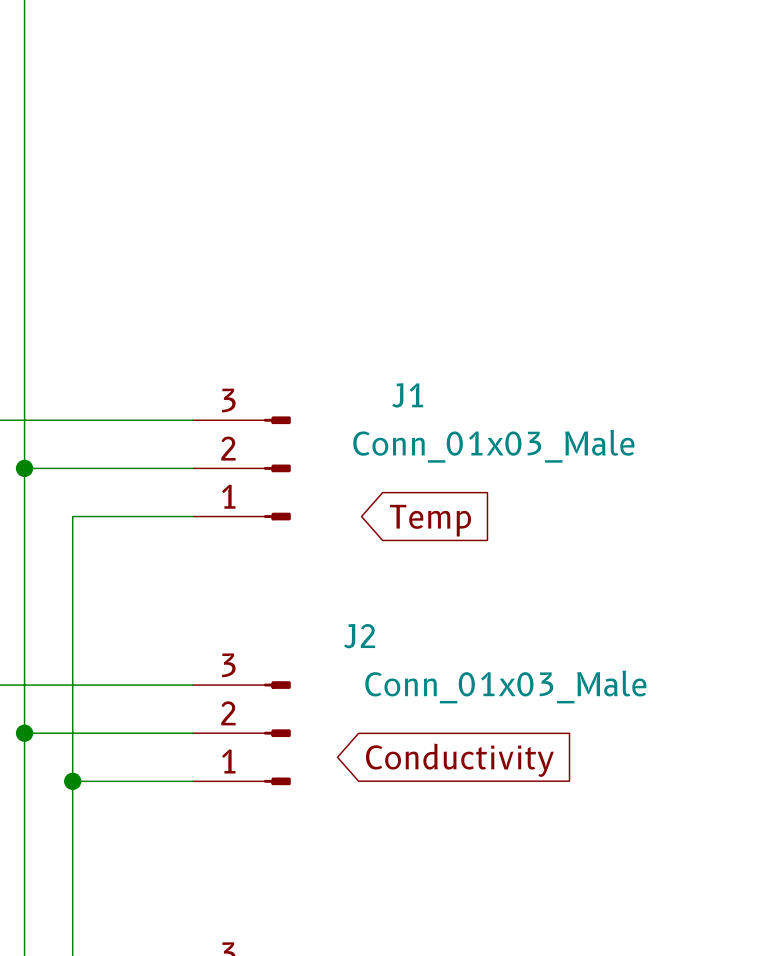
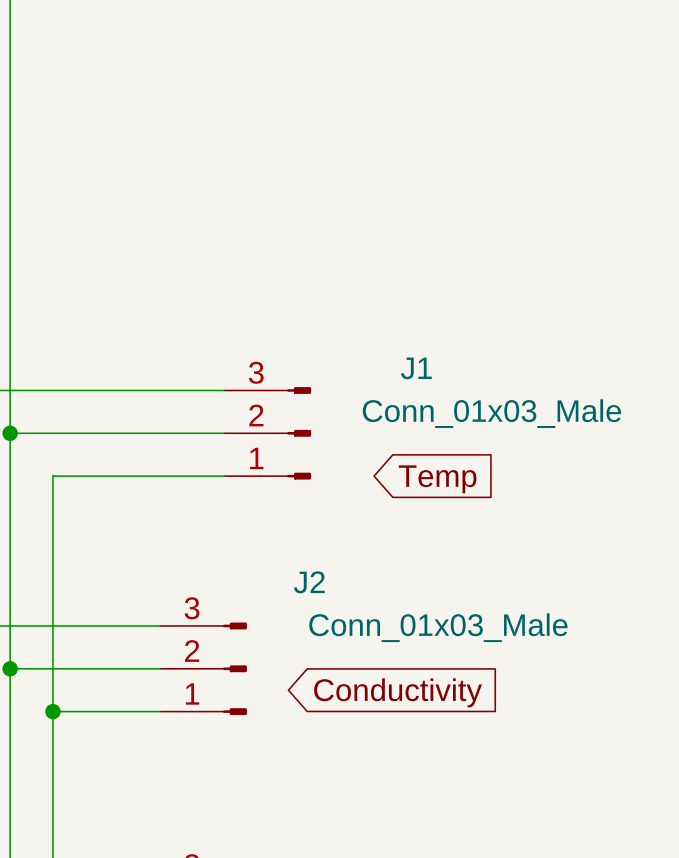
J1 position: (241, 468) -> (267, 433)
global label position: Temp (430, 520) -> Temp (437, 479)

